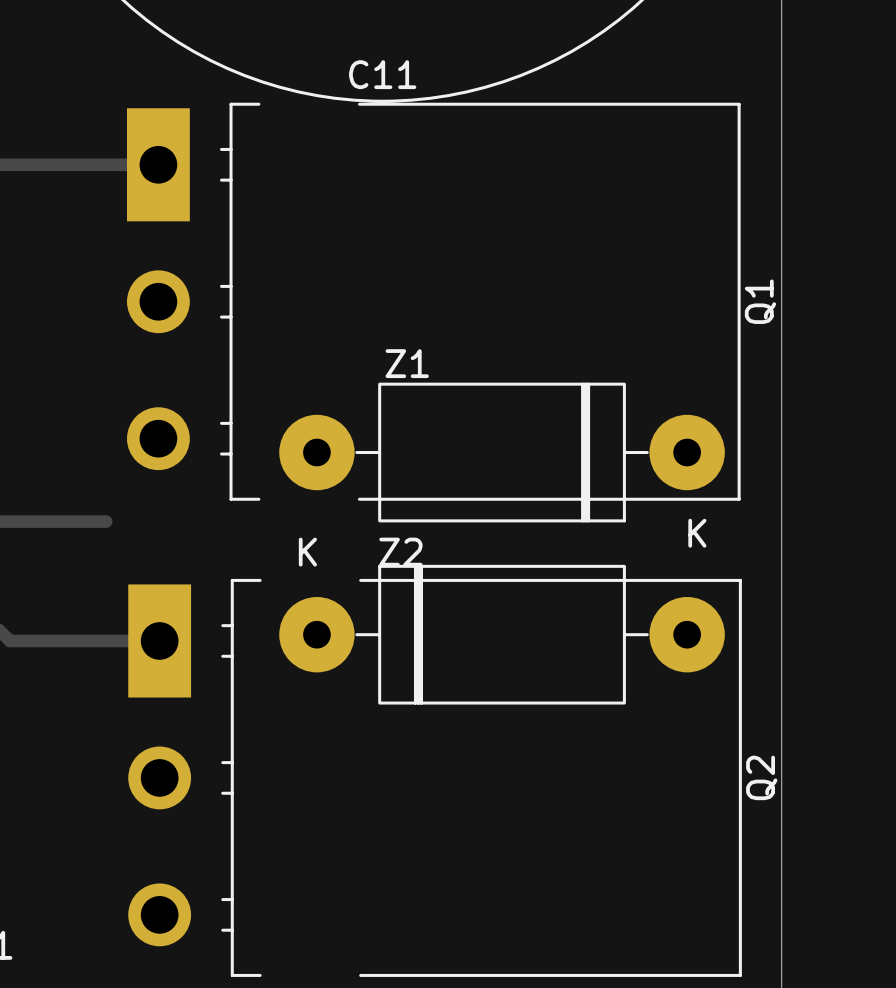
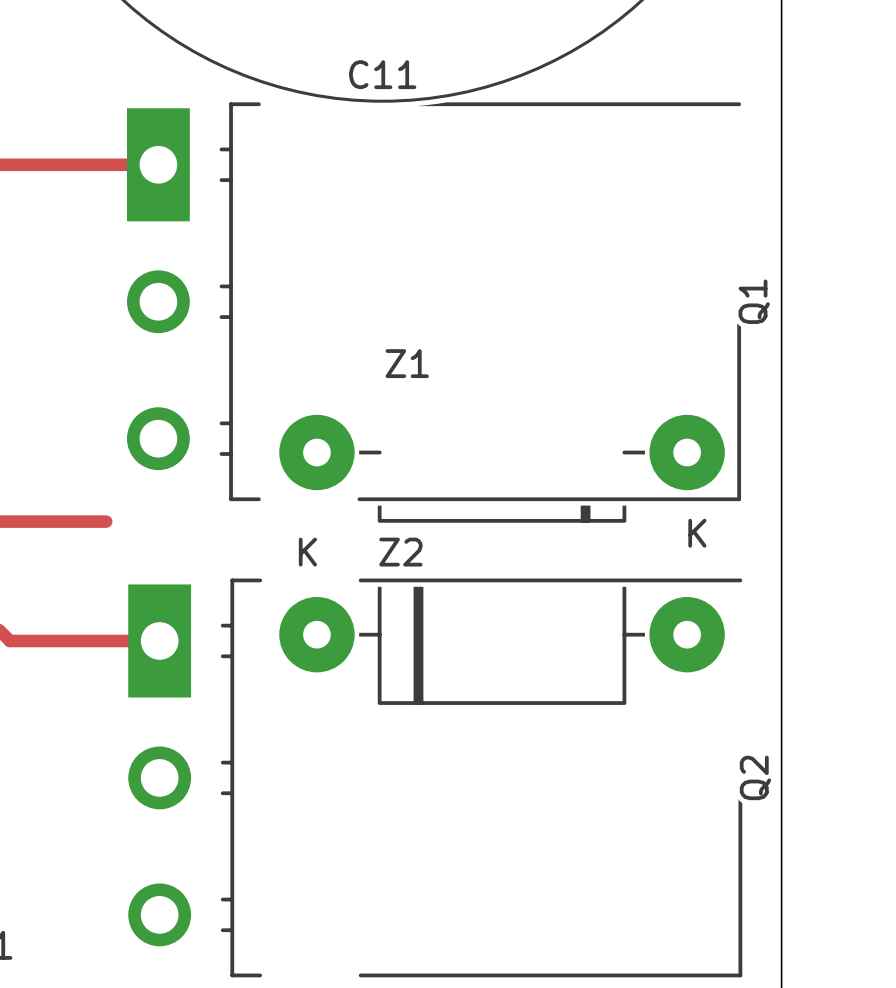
Q1 footprint: [126, 102, 741, 501] -> [126, 102, 742, 502]
Z1 footprint: [279, 382, 725, 523] -> [279, 414, 725, 523]
Z2 footprint: [279, 564, 725, 705] -> [279, 586, 725, 705]
Q2 footprint: [128, 578, 742, 977] -> [128, 578, 743, 978]

